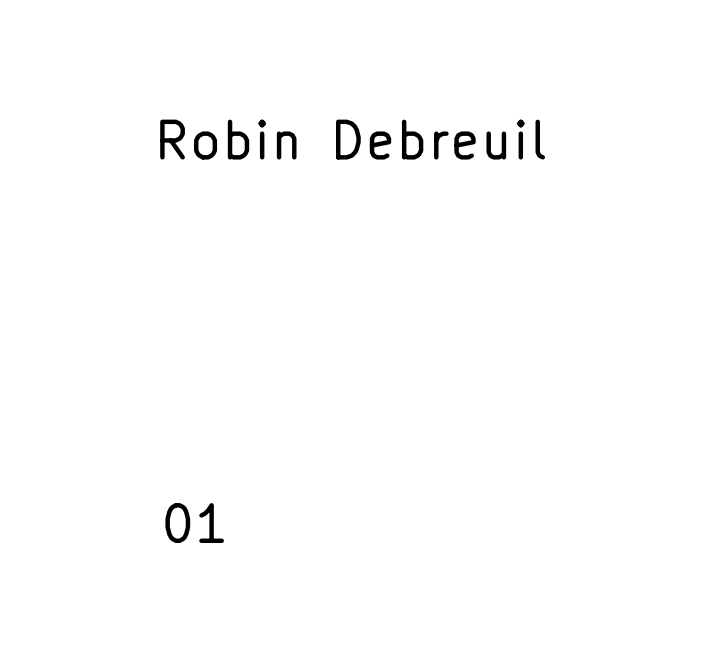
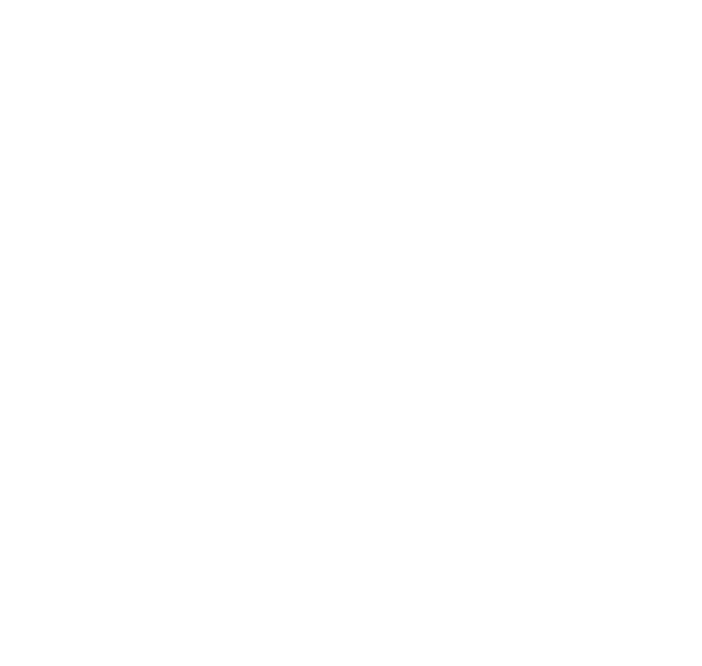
text: Robin Debreuil (352, 139) -> none
text: 01 (194, 523) -> none

